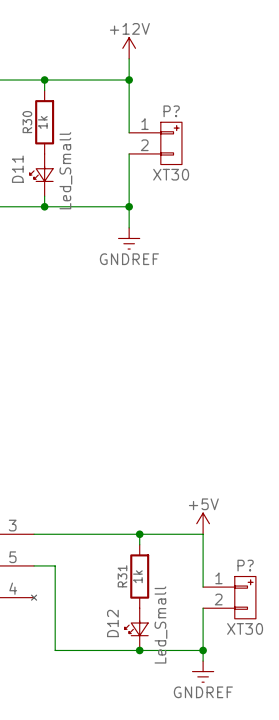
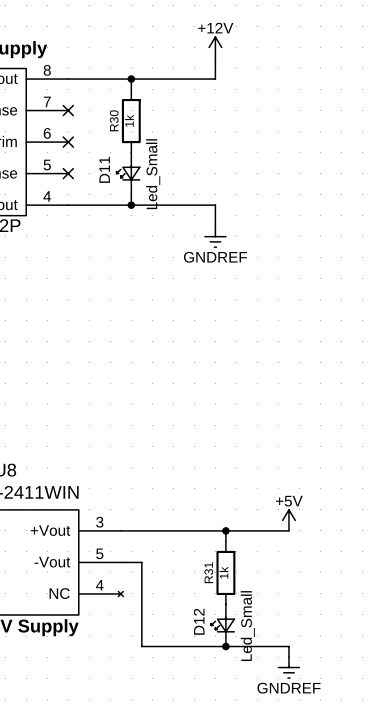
wire: (129, 80) (129, 132) -> none
junction: (129, 80) -> none
P?: XT30 (155, 143) -> none
wire: (129, 153) (129, 206) -> none
junction: (129, 206) -> none
wire: (203, 534) (203, 587) -> none
P?: XT30 (229, 597) -> none
wire: (203, 608) (203, 650) -> none
junction: (203, 650) -> none

